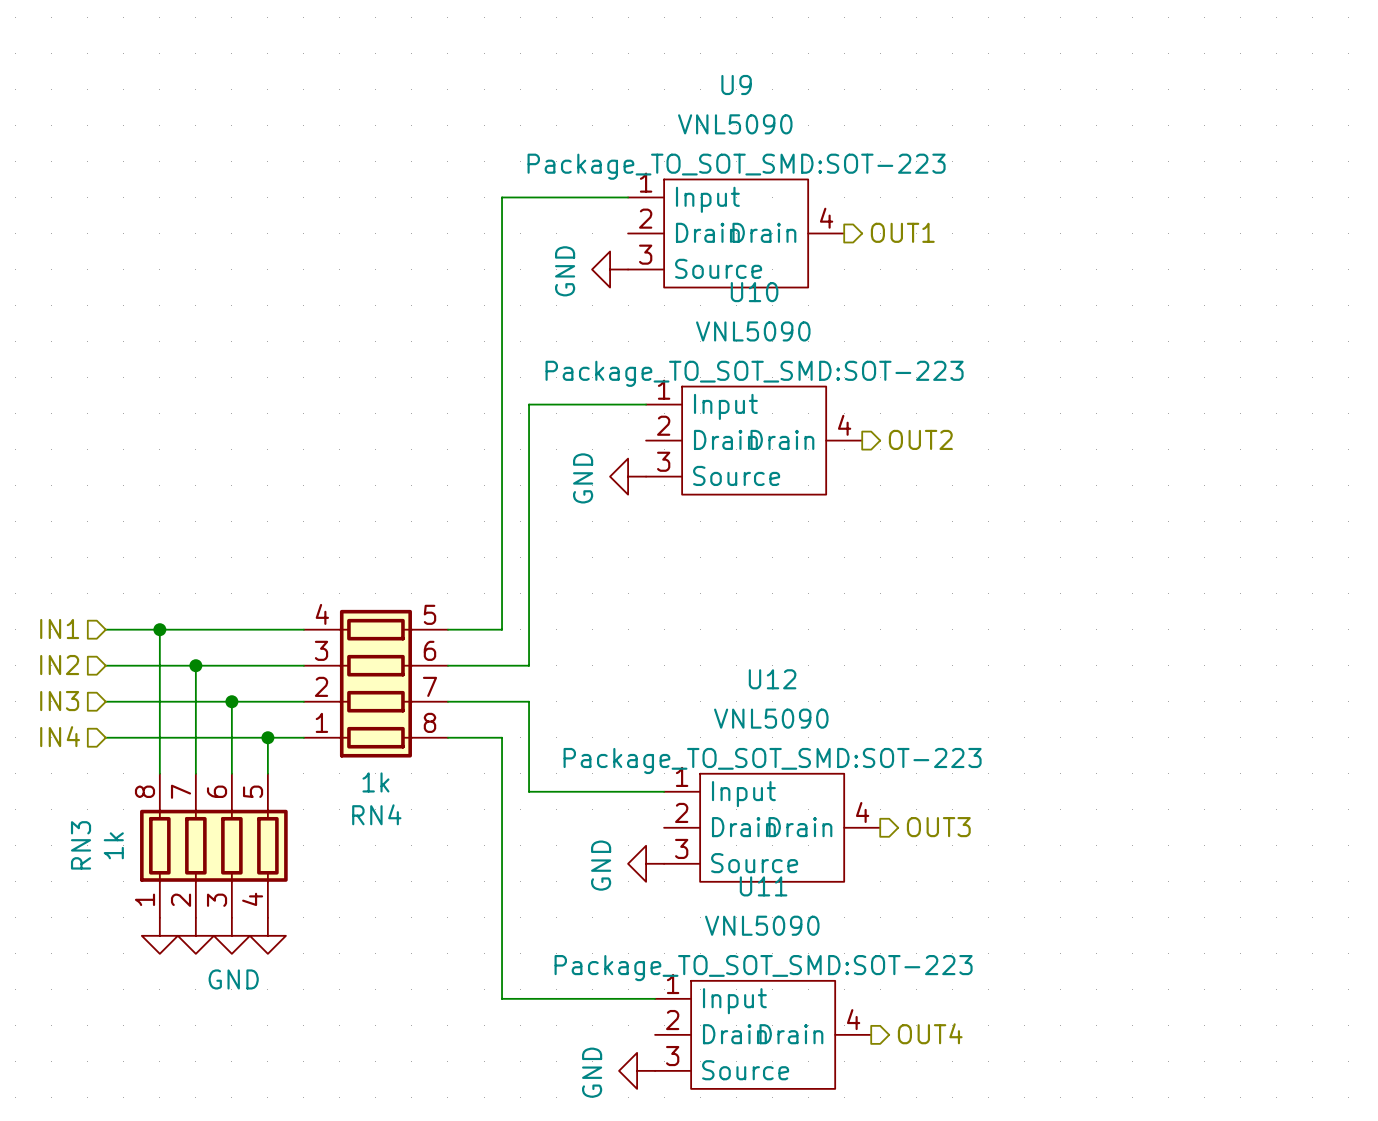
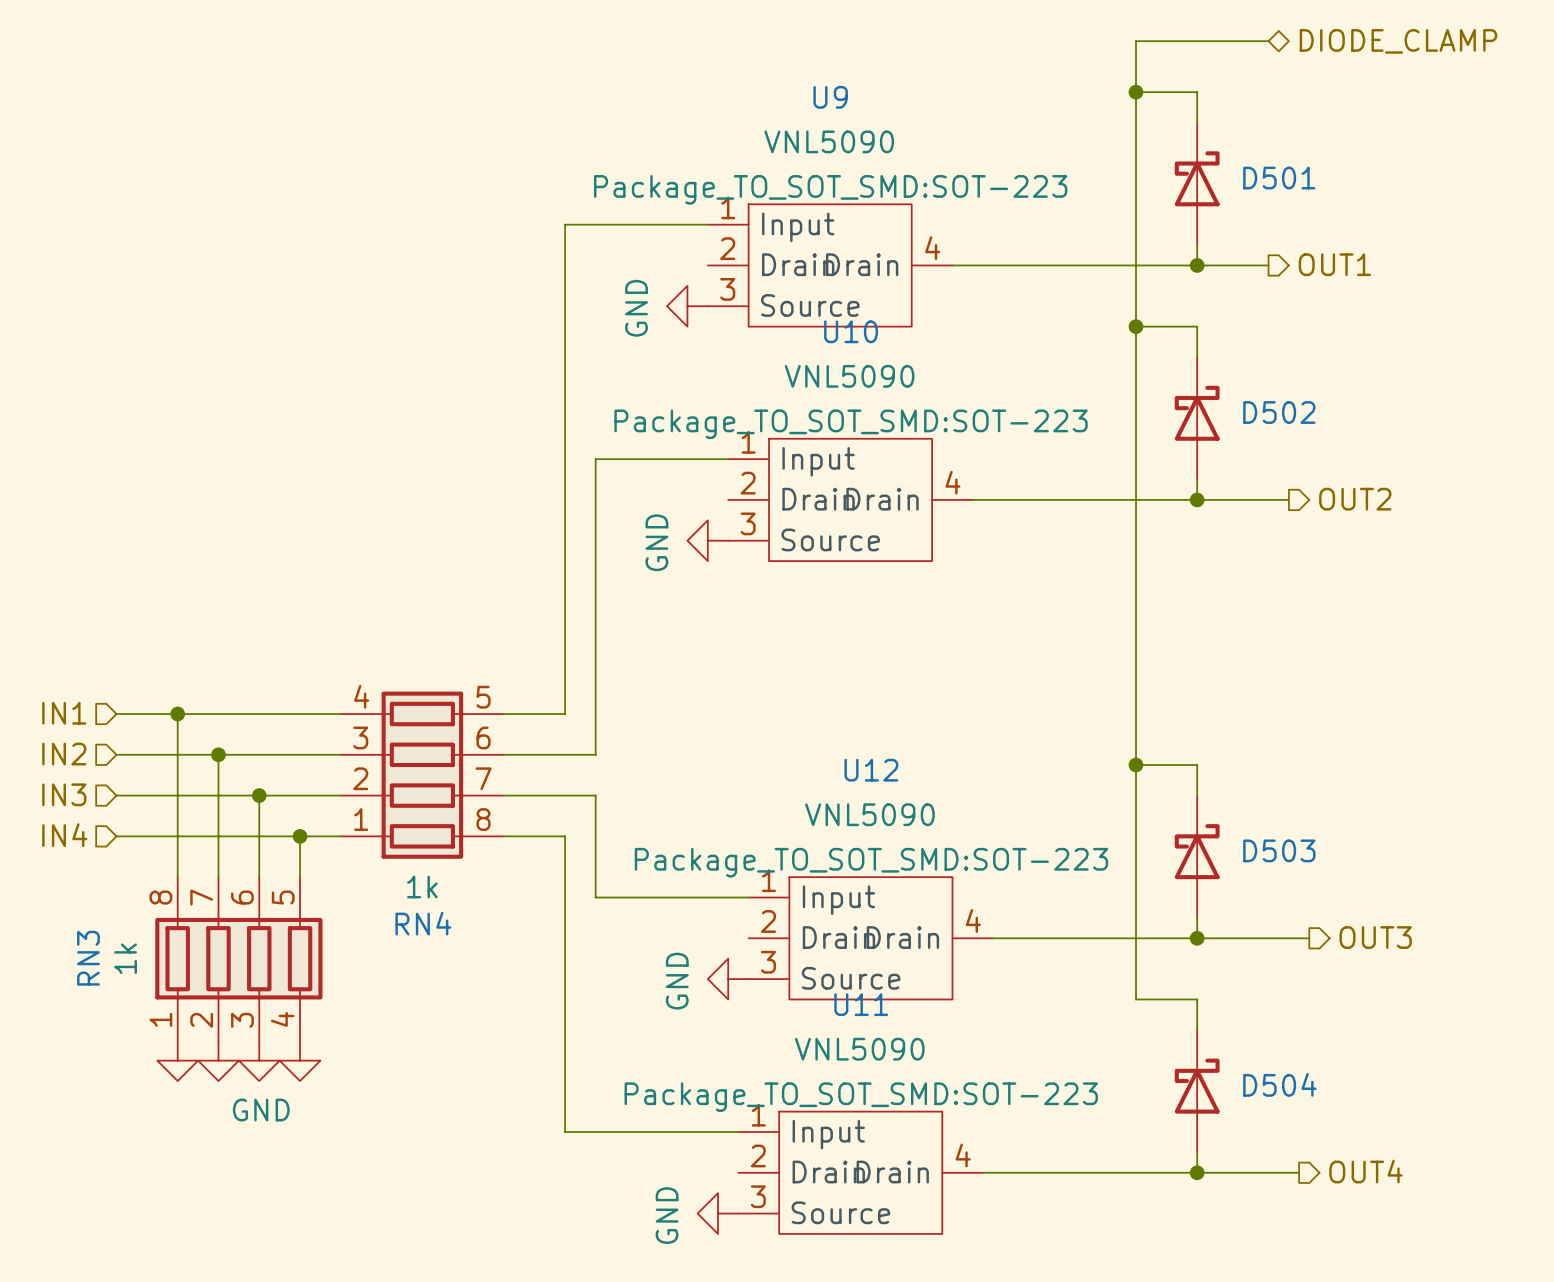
wire: none -> (1268, 41) (1136, 41) (1136, 999) (1197, 999) (1197, 1030)
hierarchical label: none -> DIODE_CLAMP (1398, 41)
wire: none -> (1136, 92) (1197, 92) (1197, 122)
junction: none -> (1136, 92)
D501: none -> (1197, 183)
wire: none -> (1197, 245) (1197, 265)
hierarchical label position: OUT1 (902, 232) -> OUT1 (1334, 264)
wire: none -> (952, 265) (1268, 265)
junction: none -> (1197, 265)
wire: none -> (1136, 326) (1197, 326) (1197, 357)
junction: none -> (1136, 326)
D502: none -> (1197, 418)
wire: none -> (1197, 479) (1197, 499)
hierarchical label position: OUT2 (920, 439) -> OUT2 (1355, 499)
wire: none -> (972, 499) (1288, 499)
junction: none -> (1197, 499)
wire: none -> (1136, 764) (1197, 764) (1197, 795)
junction: none -> (1136, 764)
D503: none -> (1197, 856)
wire: none -> (1197, 917) (1197, 938)
wire: none -> (993, 938) (1309, 938)
hierarchical label position: OUT3 (938, 827) -> OUT3 (1375, 937)
junction: none -> (1197, 938)
D504: none -> (1197, 1091)
wire: none -> (1197, 1152) (1197, 1172)
hierarchical label position: OUT4 (930, 1033) -> OUT4 (1365, 1171)
wire: none -> (983, 1172) (1299, 1172)
junction: none -> (1197, 1172)

